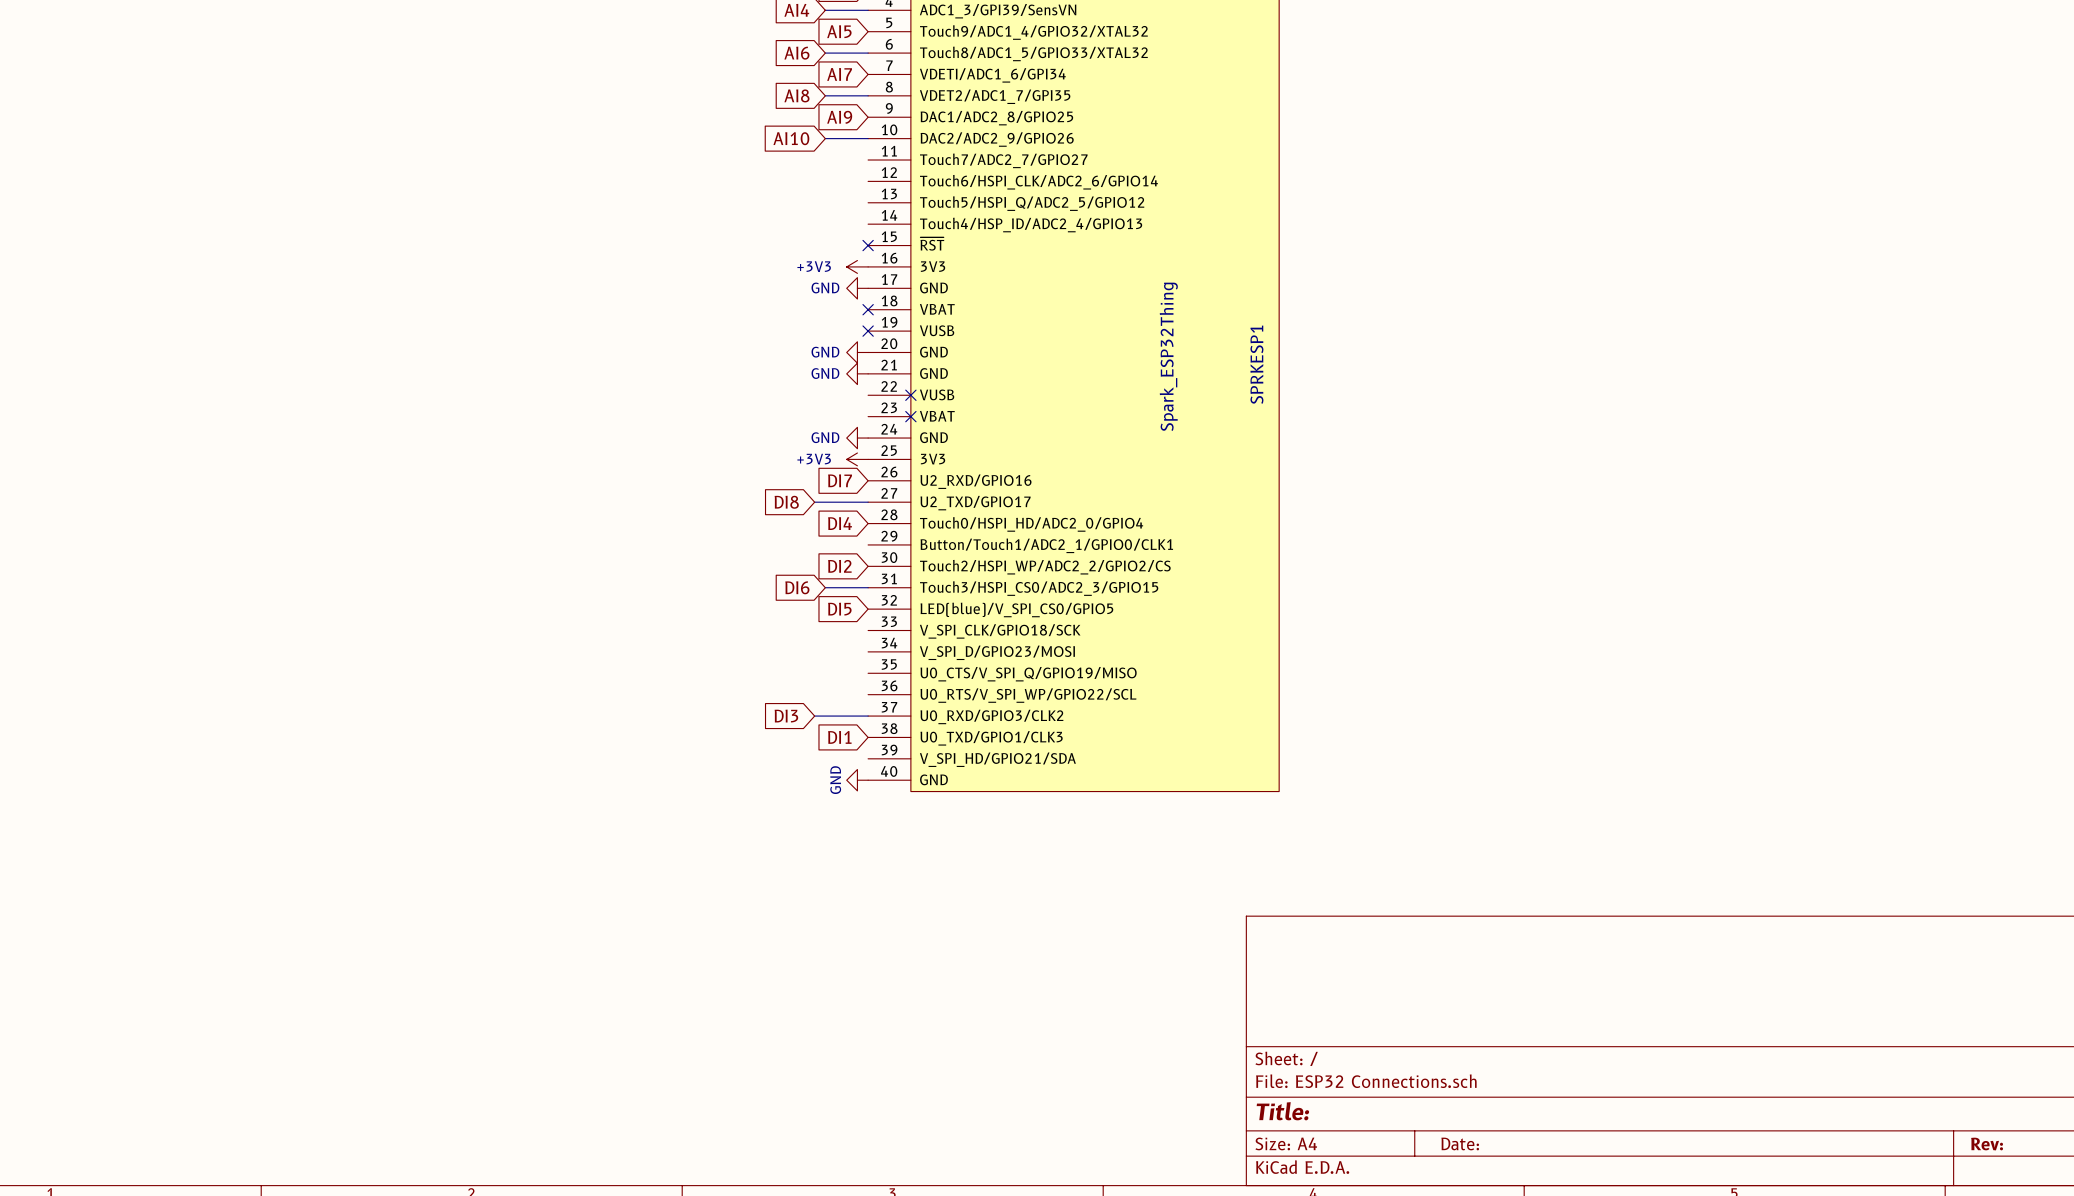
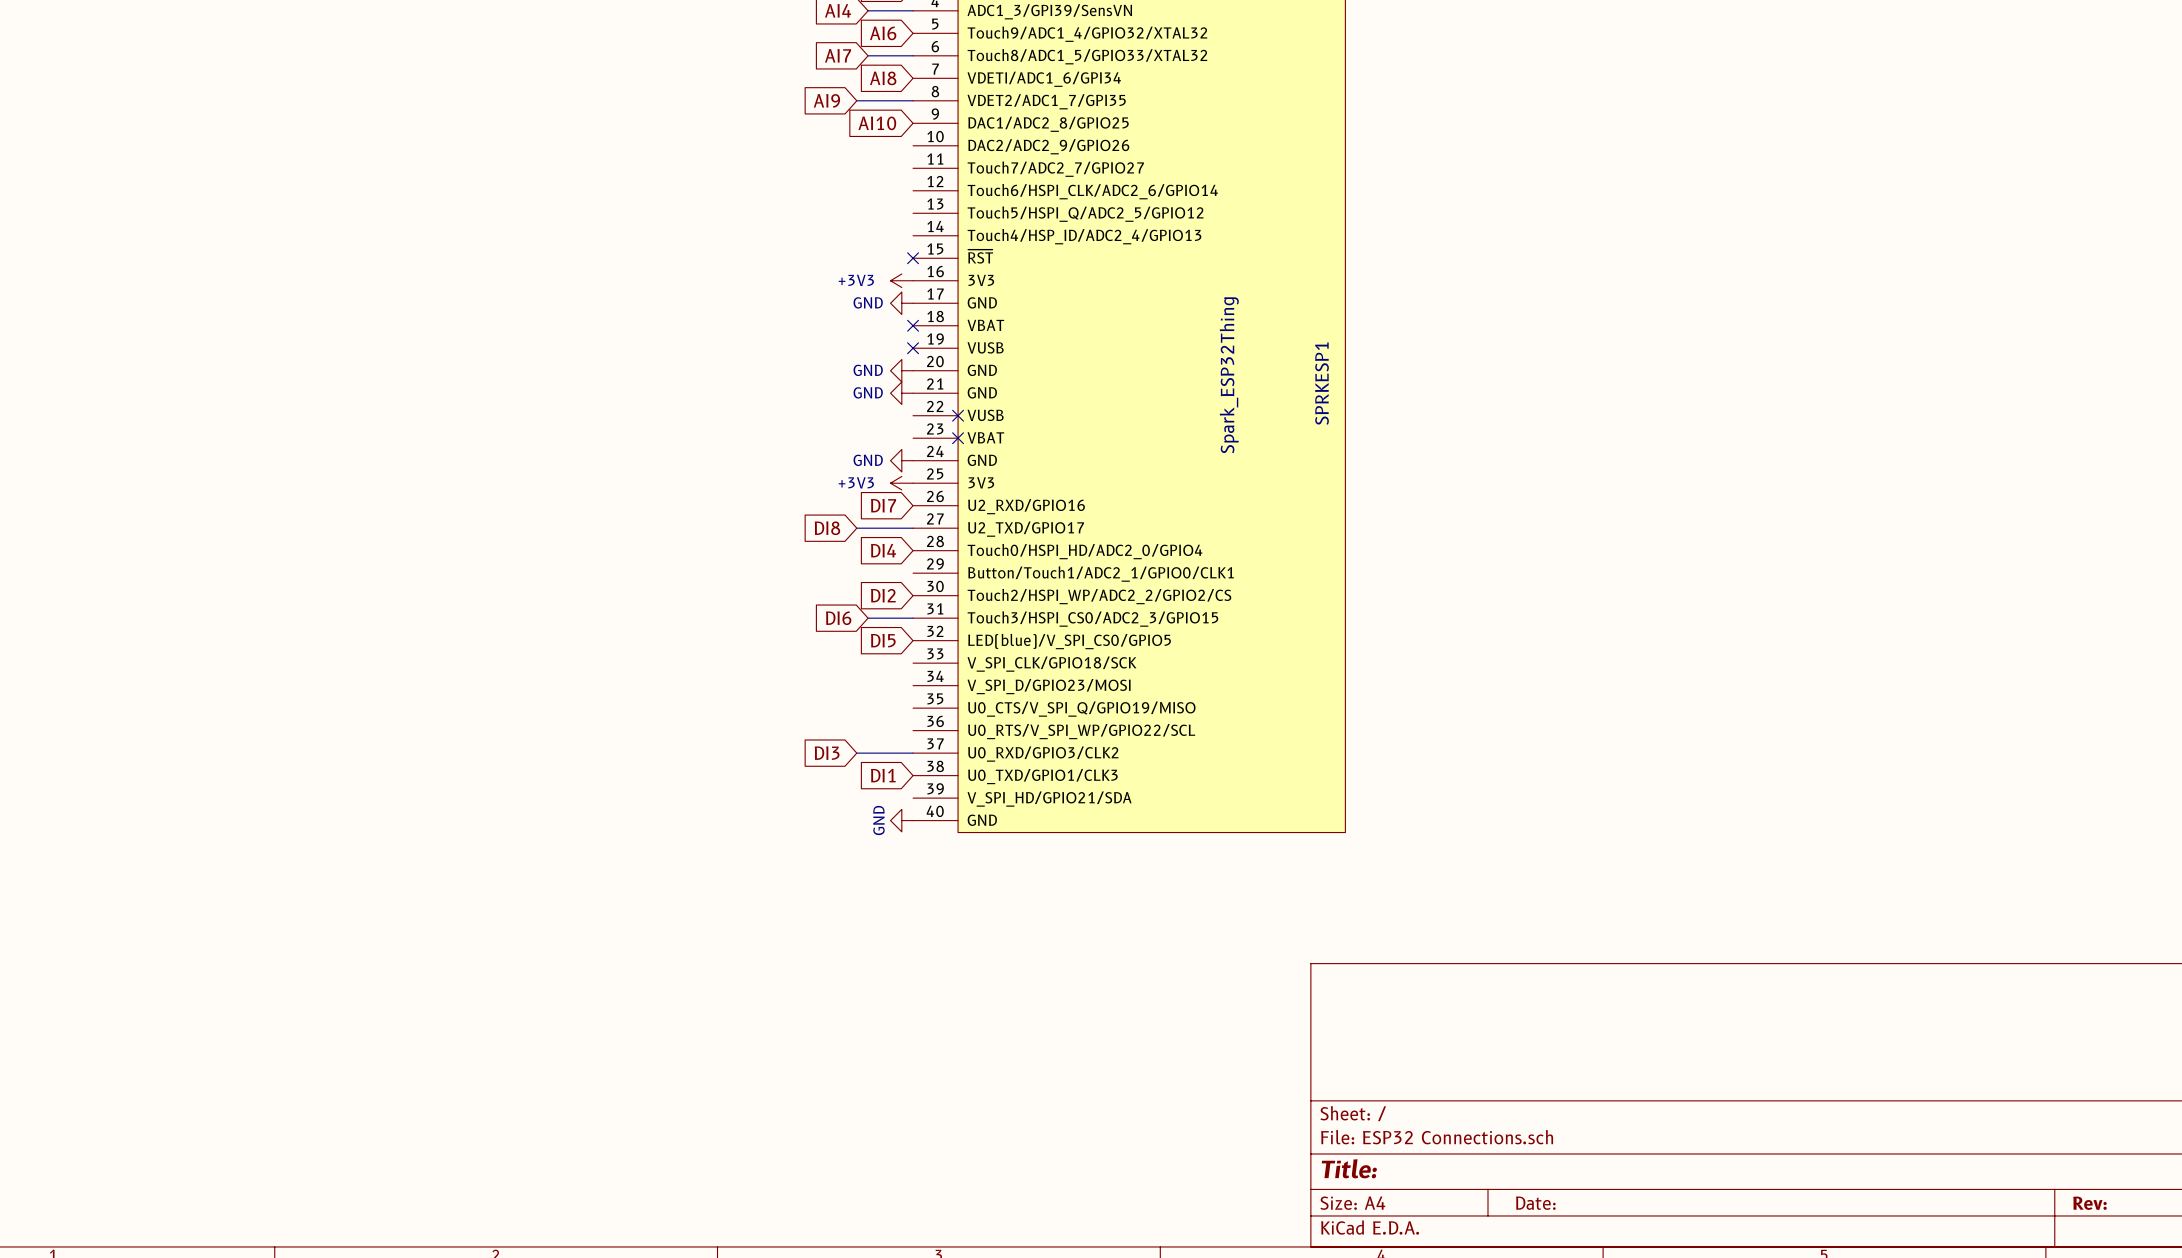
global label: AI5 (839, 31) -> AI6 (883, 33)
global label: AI6 (796, 53) -> AI7 (838, 55)
global label: AI7 (839, 74) -> AI8 (883, 78)
global label: AI8 (796, 95) -> AI9 (826, 100)
wire: none -> (856, 100) (868, 100)
global label: AI9 (839, 117) -> AI10 (877, 123)
global label: AI10 (791, 138) -> none
wire: (825, 138) (868, 138) -> none

